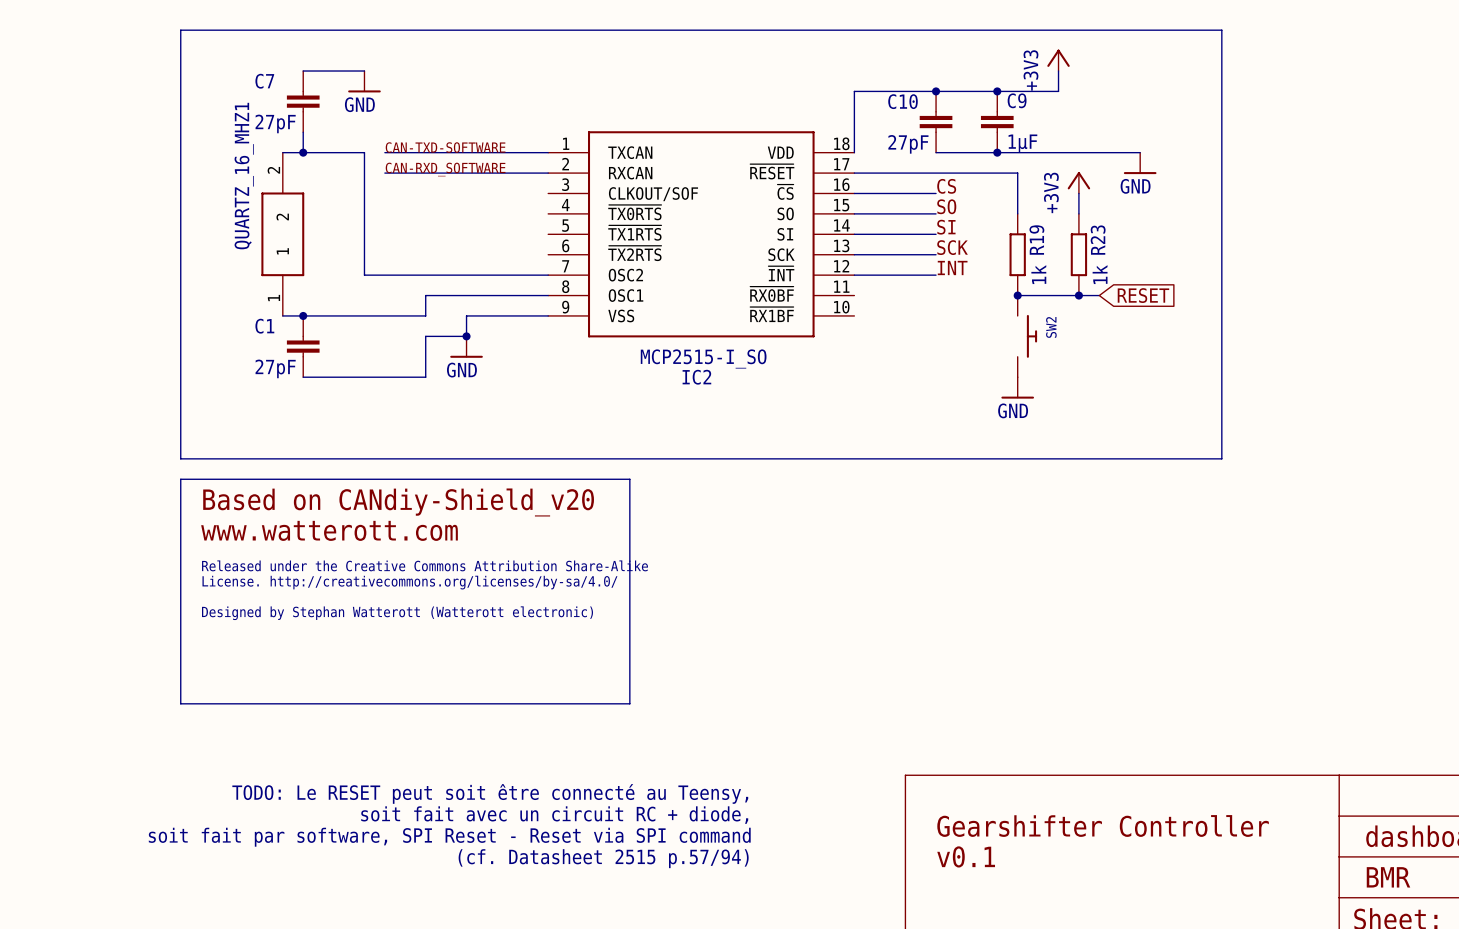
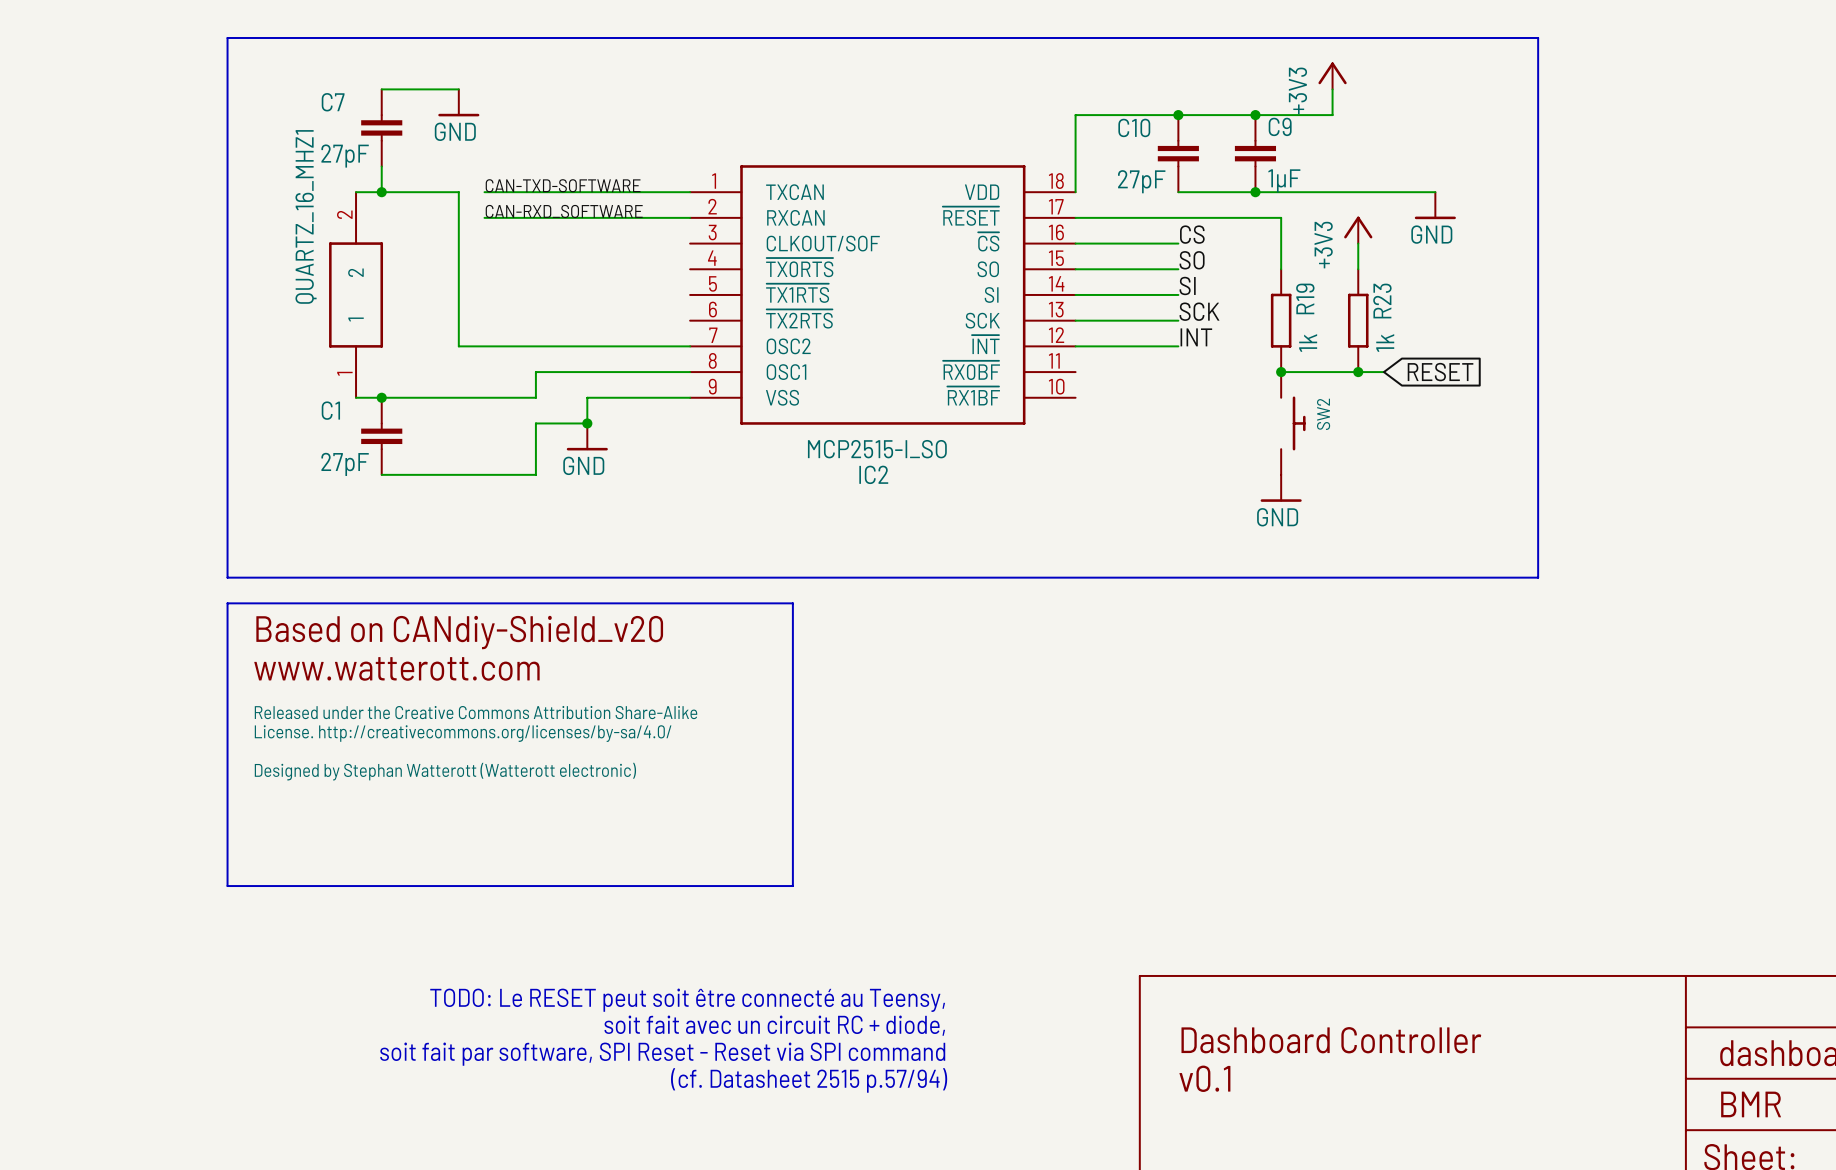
text: Gearshifter Controller (1103, 825) -> Dashboard Controller (1331, 1040)

